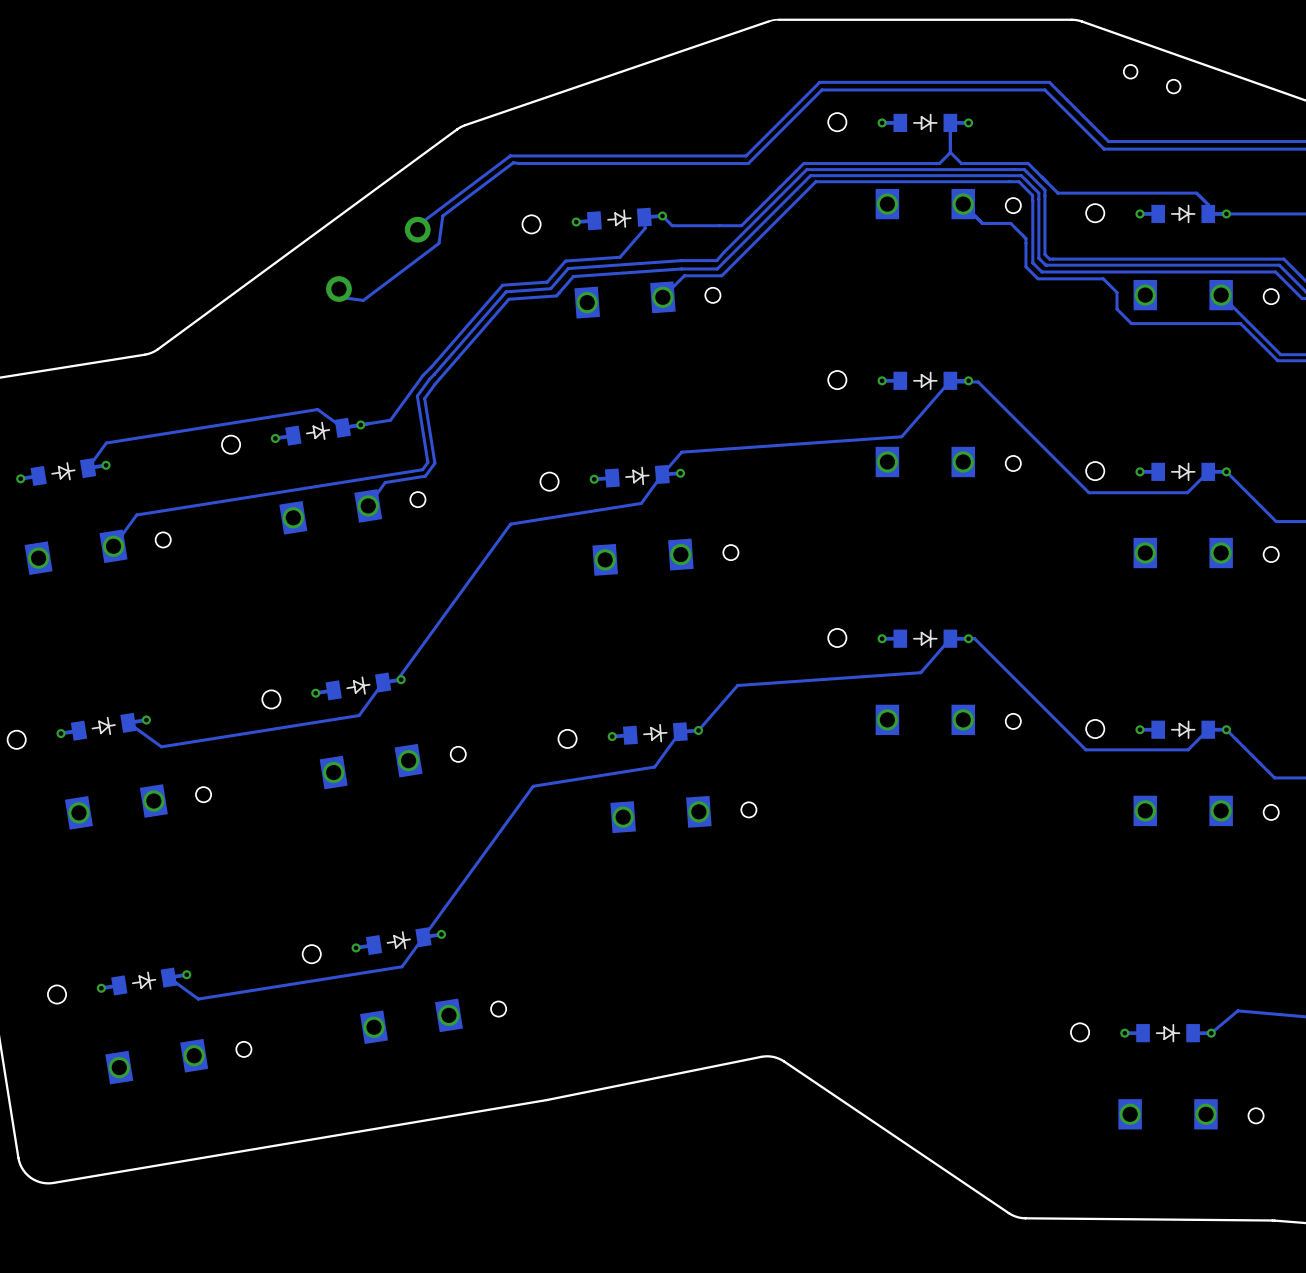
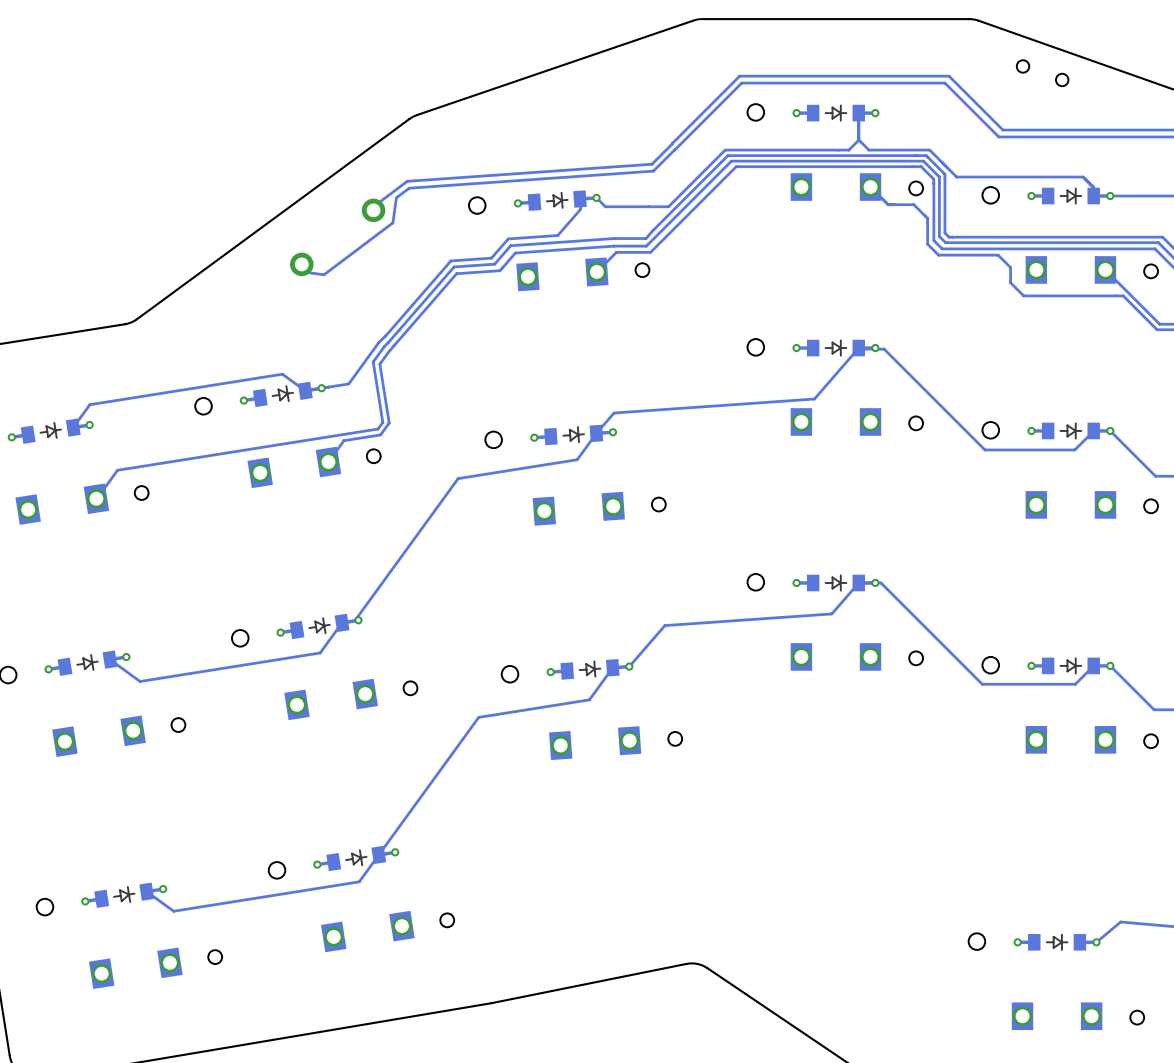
track: (746, 155) (510, 155) (454, 197) -> (672, 143) (652, 164) (407, 181)
track: (748, 163) (513, 162) (456, 205) -> (674, 150) (653, 171) (409, 188)

